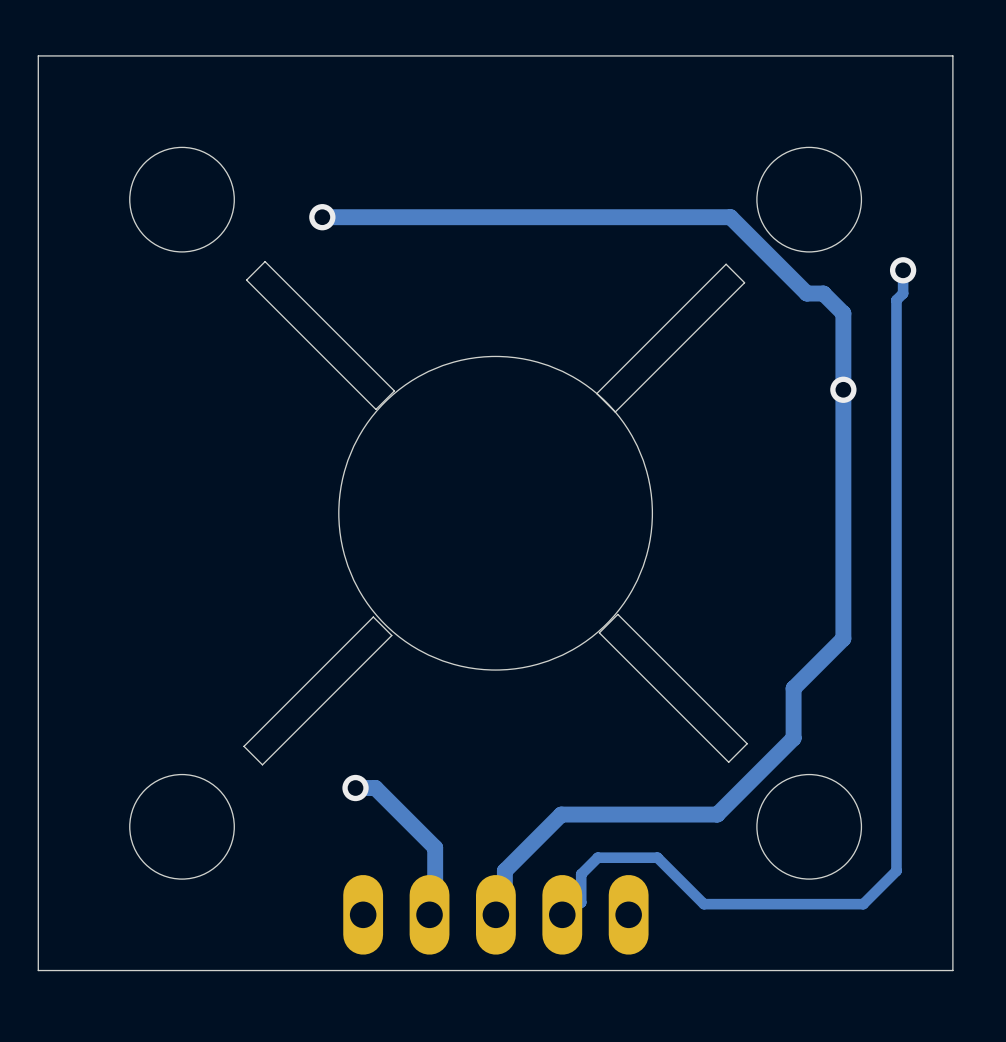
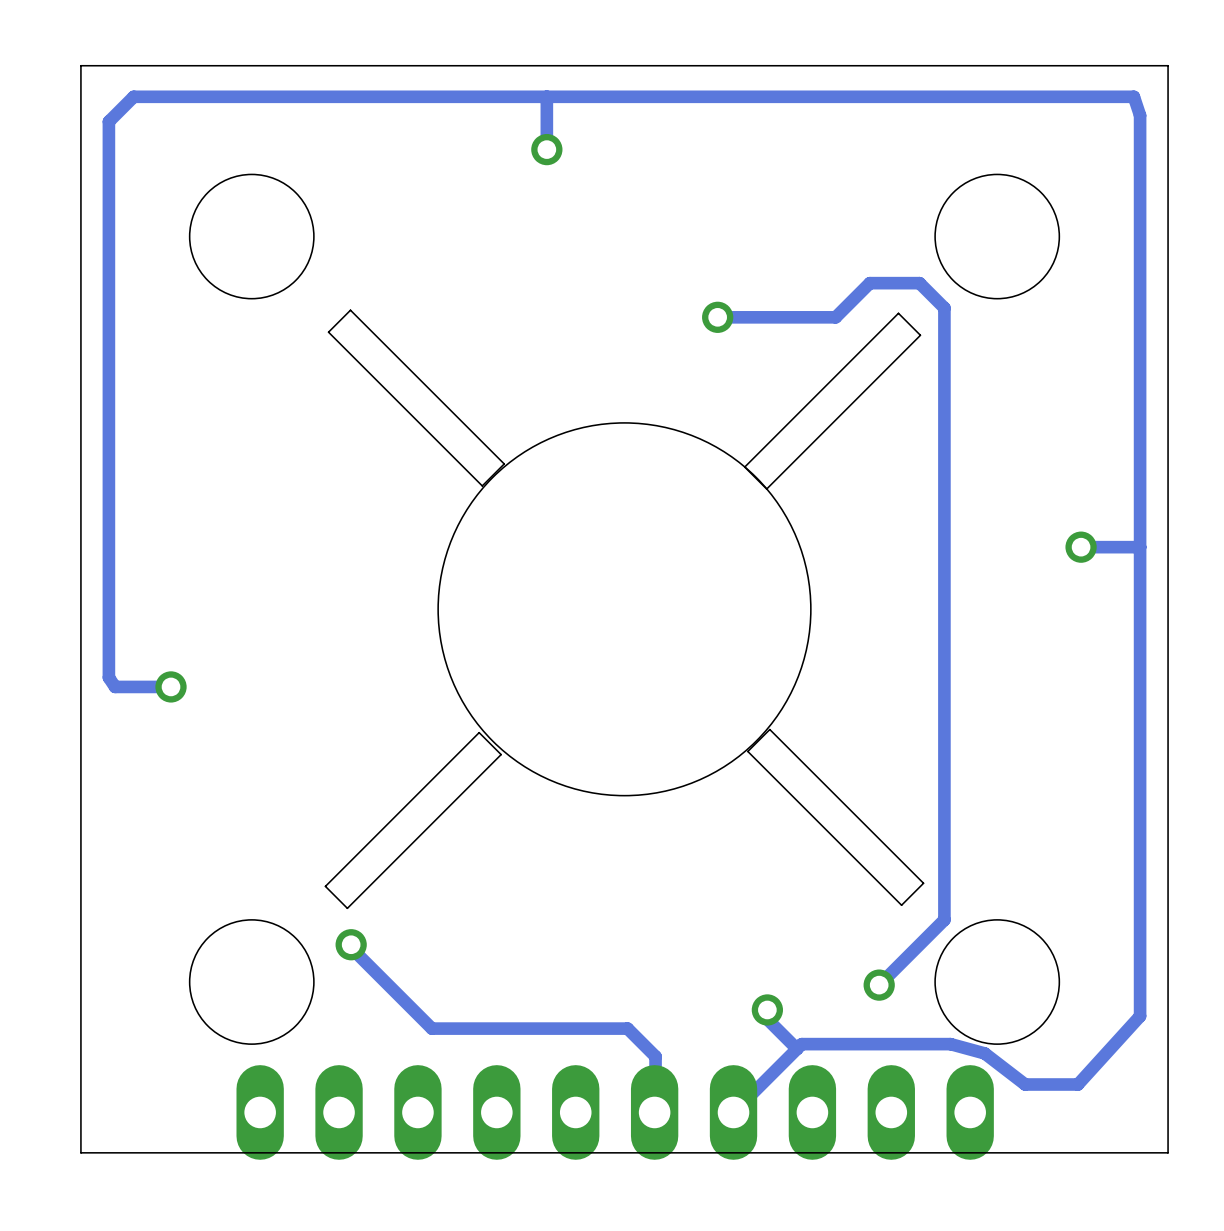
track: none -> (546, 96) (546, 149)
via: none -> (546, 149)
track: (322, 217) (730, 217) (806, 293) (823, 293) (843, 313) (843, 638) (793, 688) (793, 738) (717, 814) (561, 814) (504, 870) (504, 912) (495, 914) -> none
via: (322, 217) -> none
track: none -> (717, 317) (835, 317) (869, 283) (919, 283) (944, 308) (944, 919) (879, 985)
via: none -> (717, 317)
track: (903, 270) (903, 293) (896, 300) (896, 870) (863, 904) (703, 904) (657, 857) (597, 857) (581, 874) (581, 902) (562, 914) -> none
via: (903, 270) -> none
via position: (843, 389) -> (1081, 547)
track: none -> (1140, 547) (1081, 547)
track: none -> (171, 686) (115, 686) (108, 677) (108, 121) (133, 96) (1133, 96) (1140, 115) (1140, 1016) (1077, 1084) (1025, 1084) (984, 1053) (950, 1044) (801, 1044) (733, 1112)
via: none -> (171, 686)
track: (355, 788) (375, 788) (435, 847) (435, 915) (429, 914) -> none
via position: (355, 788) -> (351, 944)
track: none -> (351, 944) (351, 947) (431, 1028) (627, 1028) (655, 1056) (654, 1112)
via: none -> (879, 985)
track: none -> (767, 1009) (767, 1019) (797, 1048)
via: none -> (767, 1009)
part footprint: [343, 875, 649, 955] -> [236, 1065, 994, 1160]

